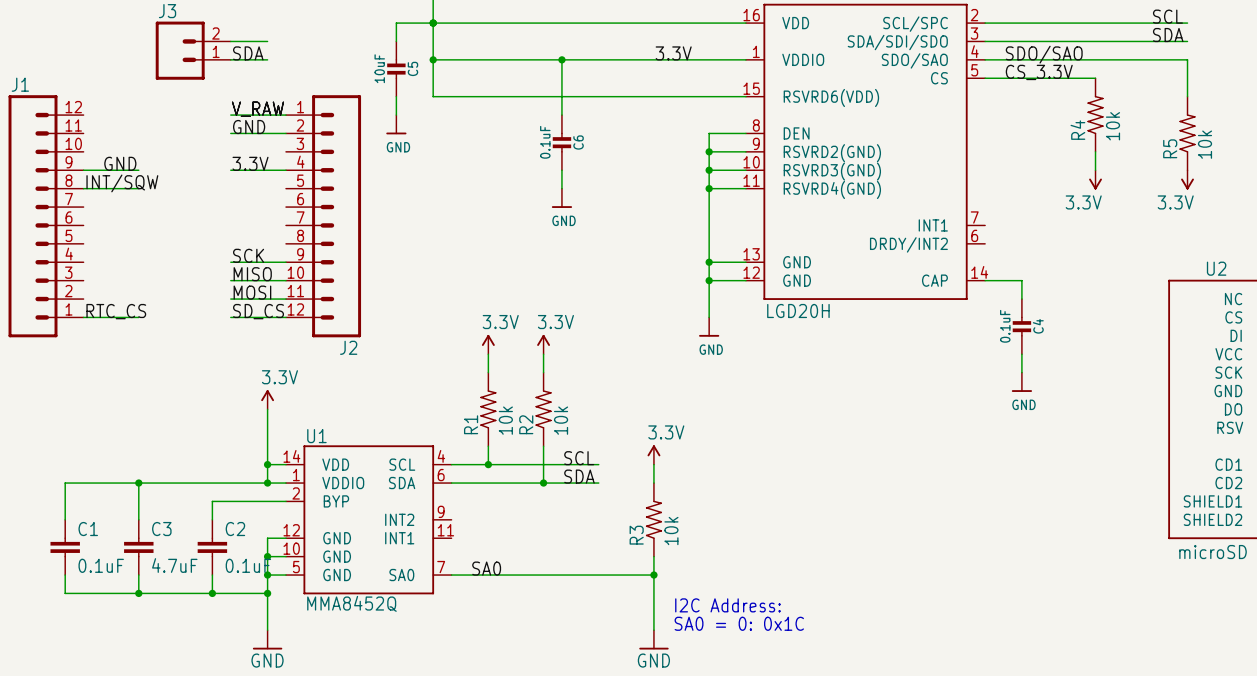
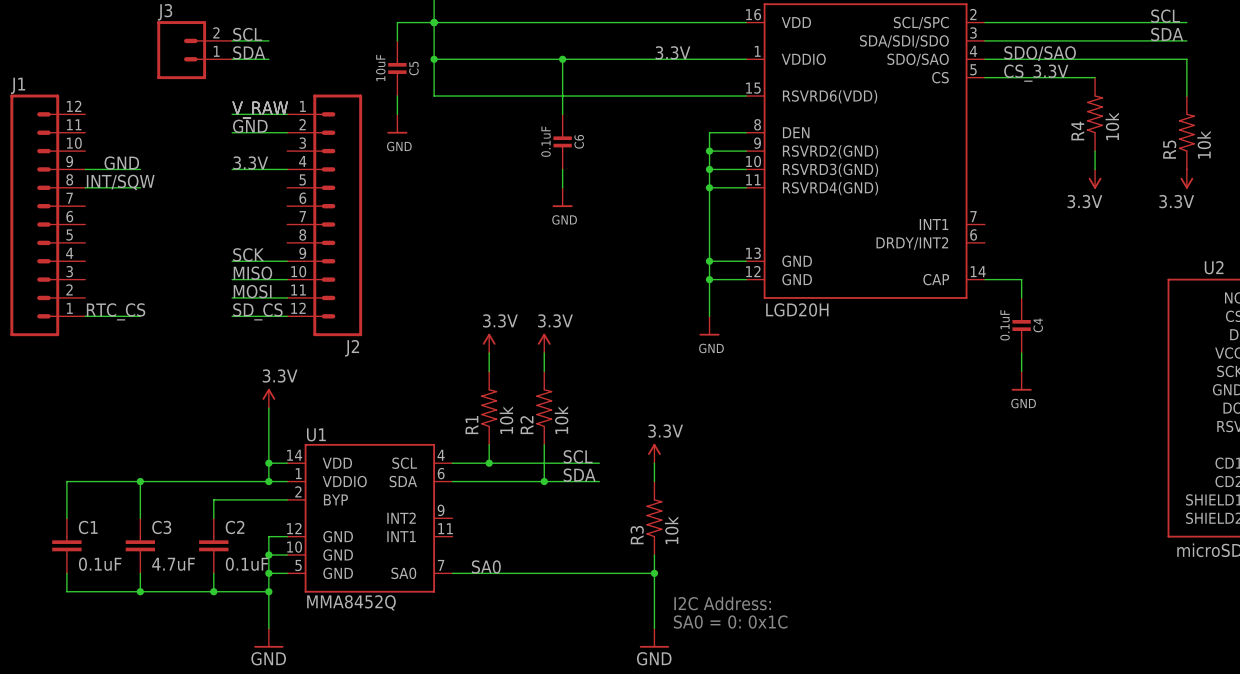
label: none -> SCL (247, 34)

